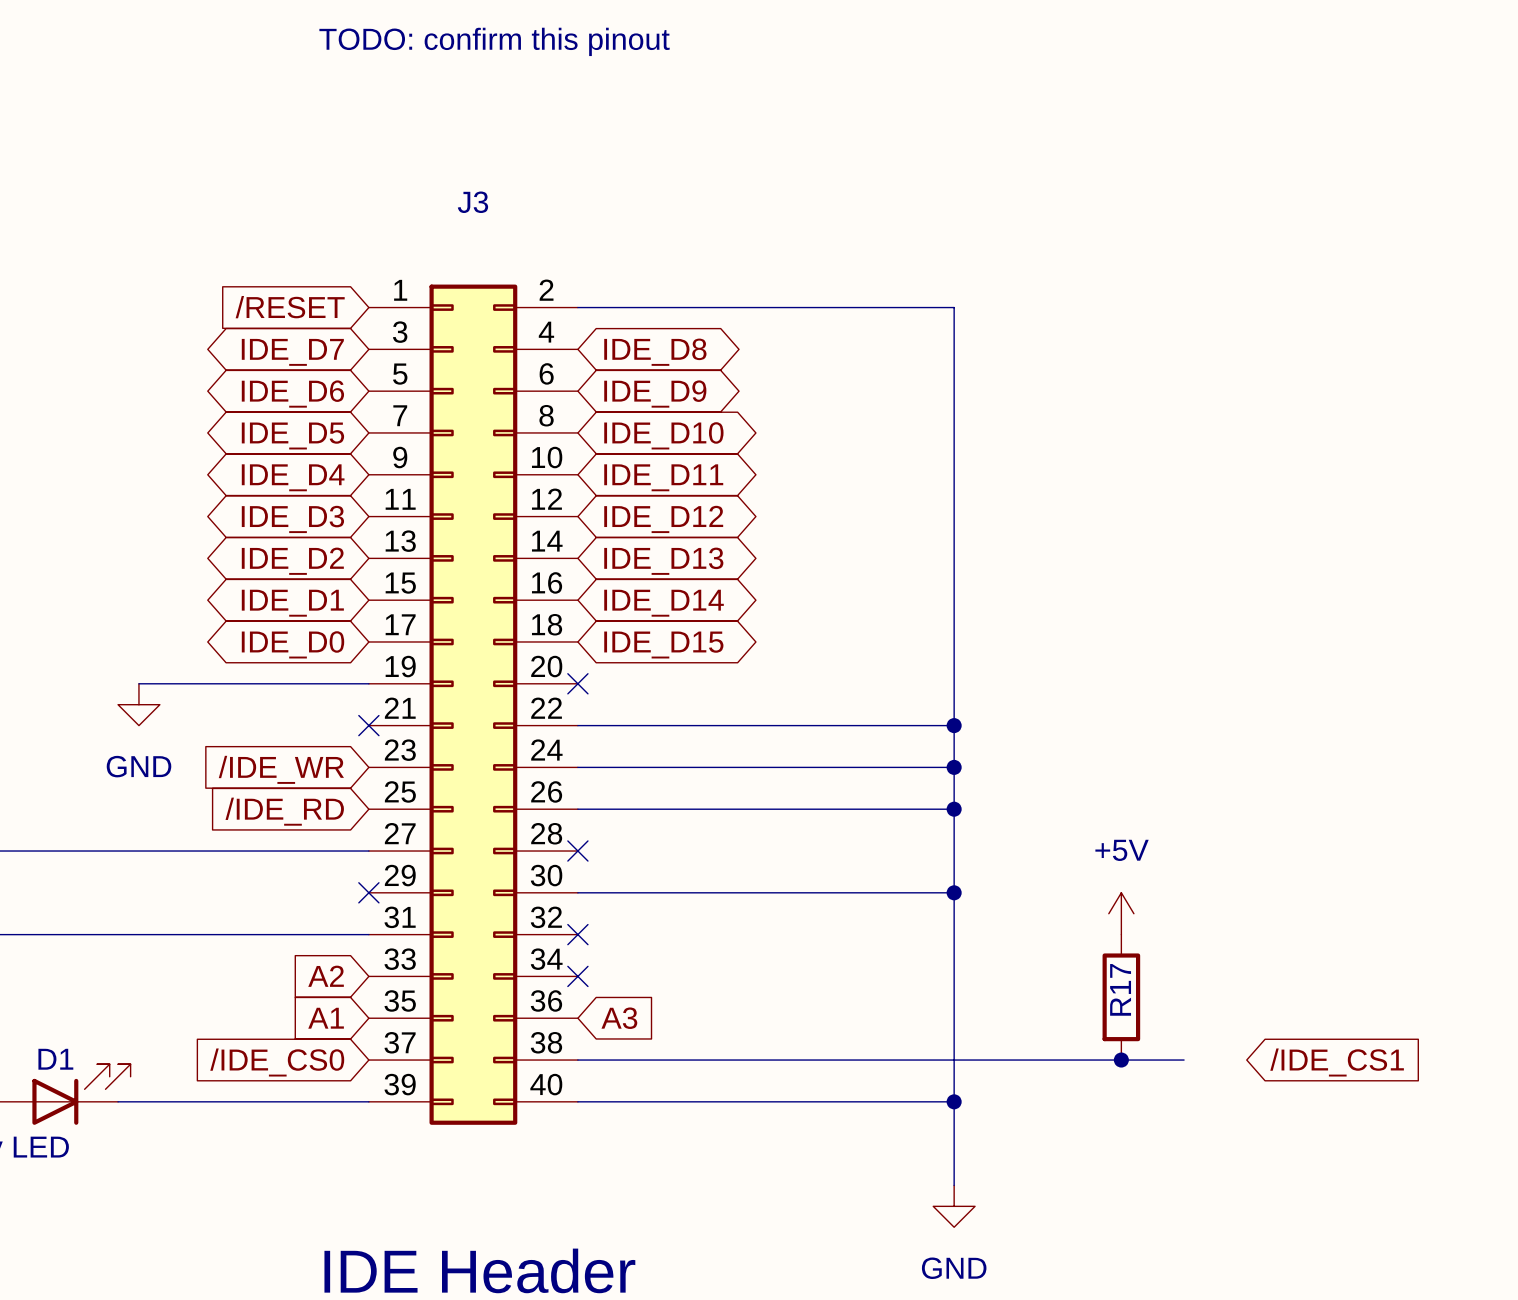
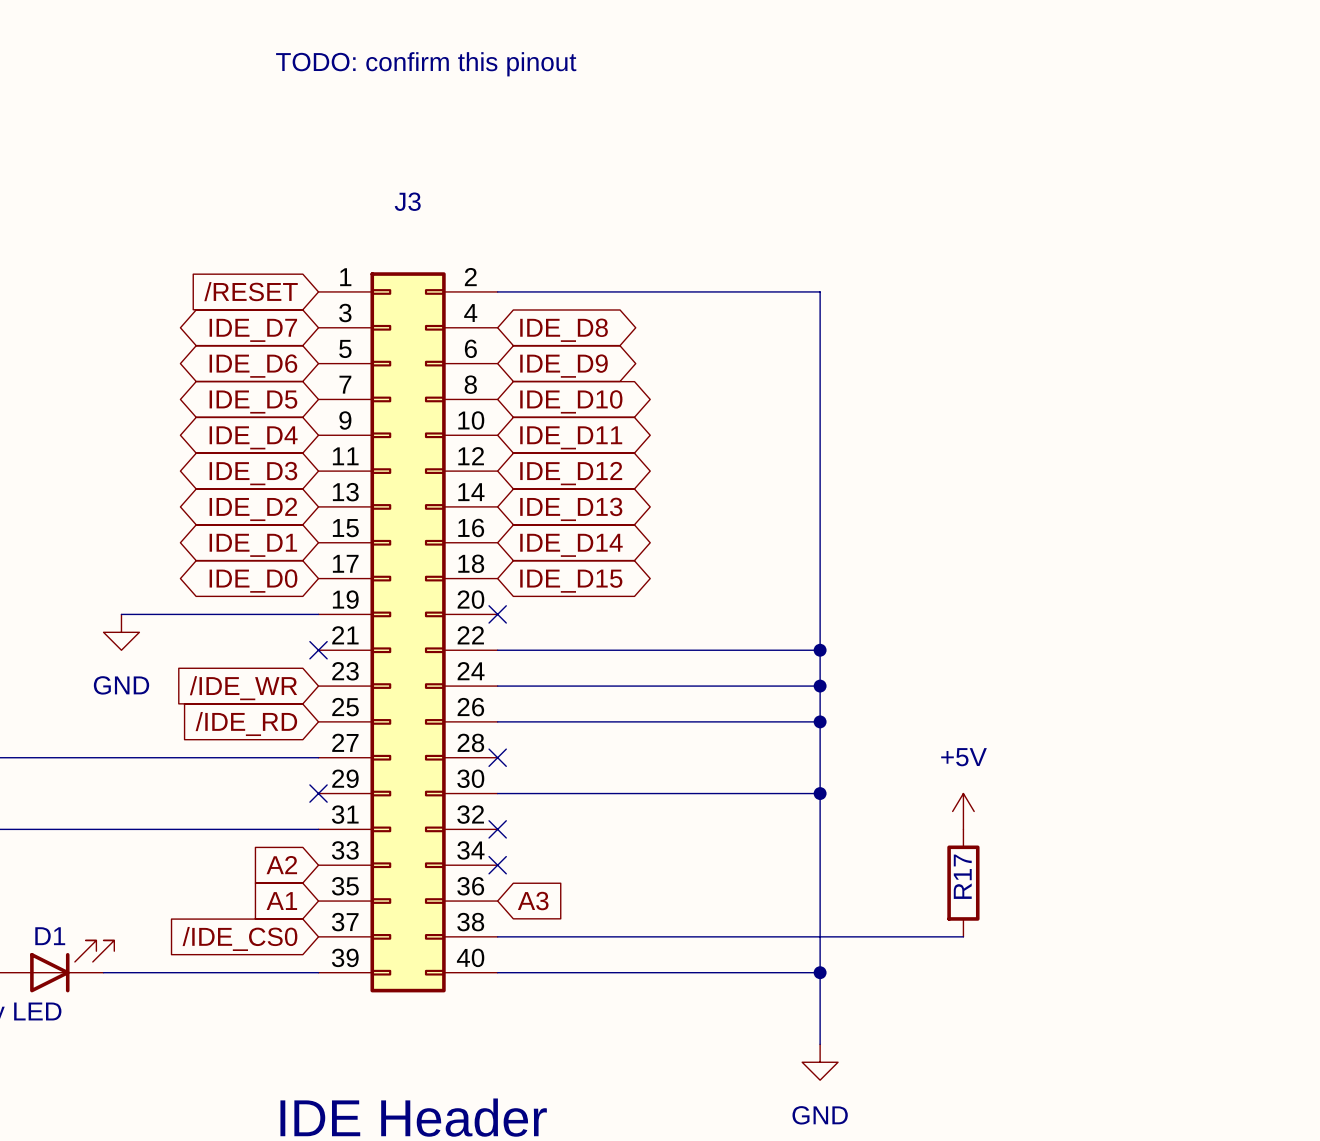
wire: (1121, 1060) (1184, 1060) -> none
junction: (1121, 1060) -> none
global label: /IDE_CS1 (1337, 1062) -> none

